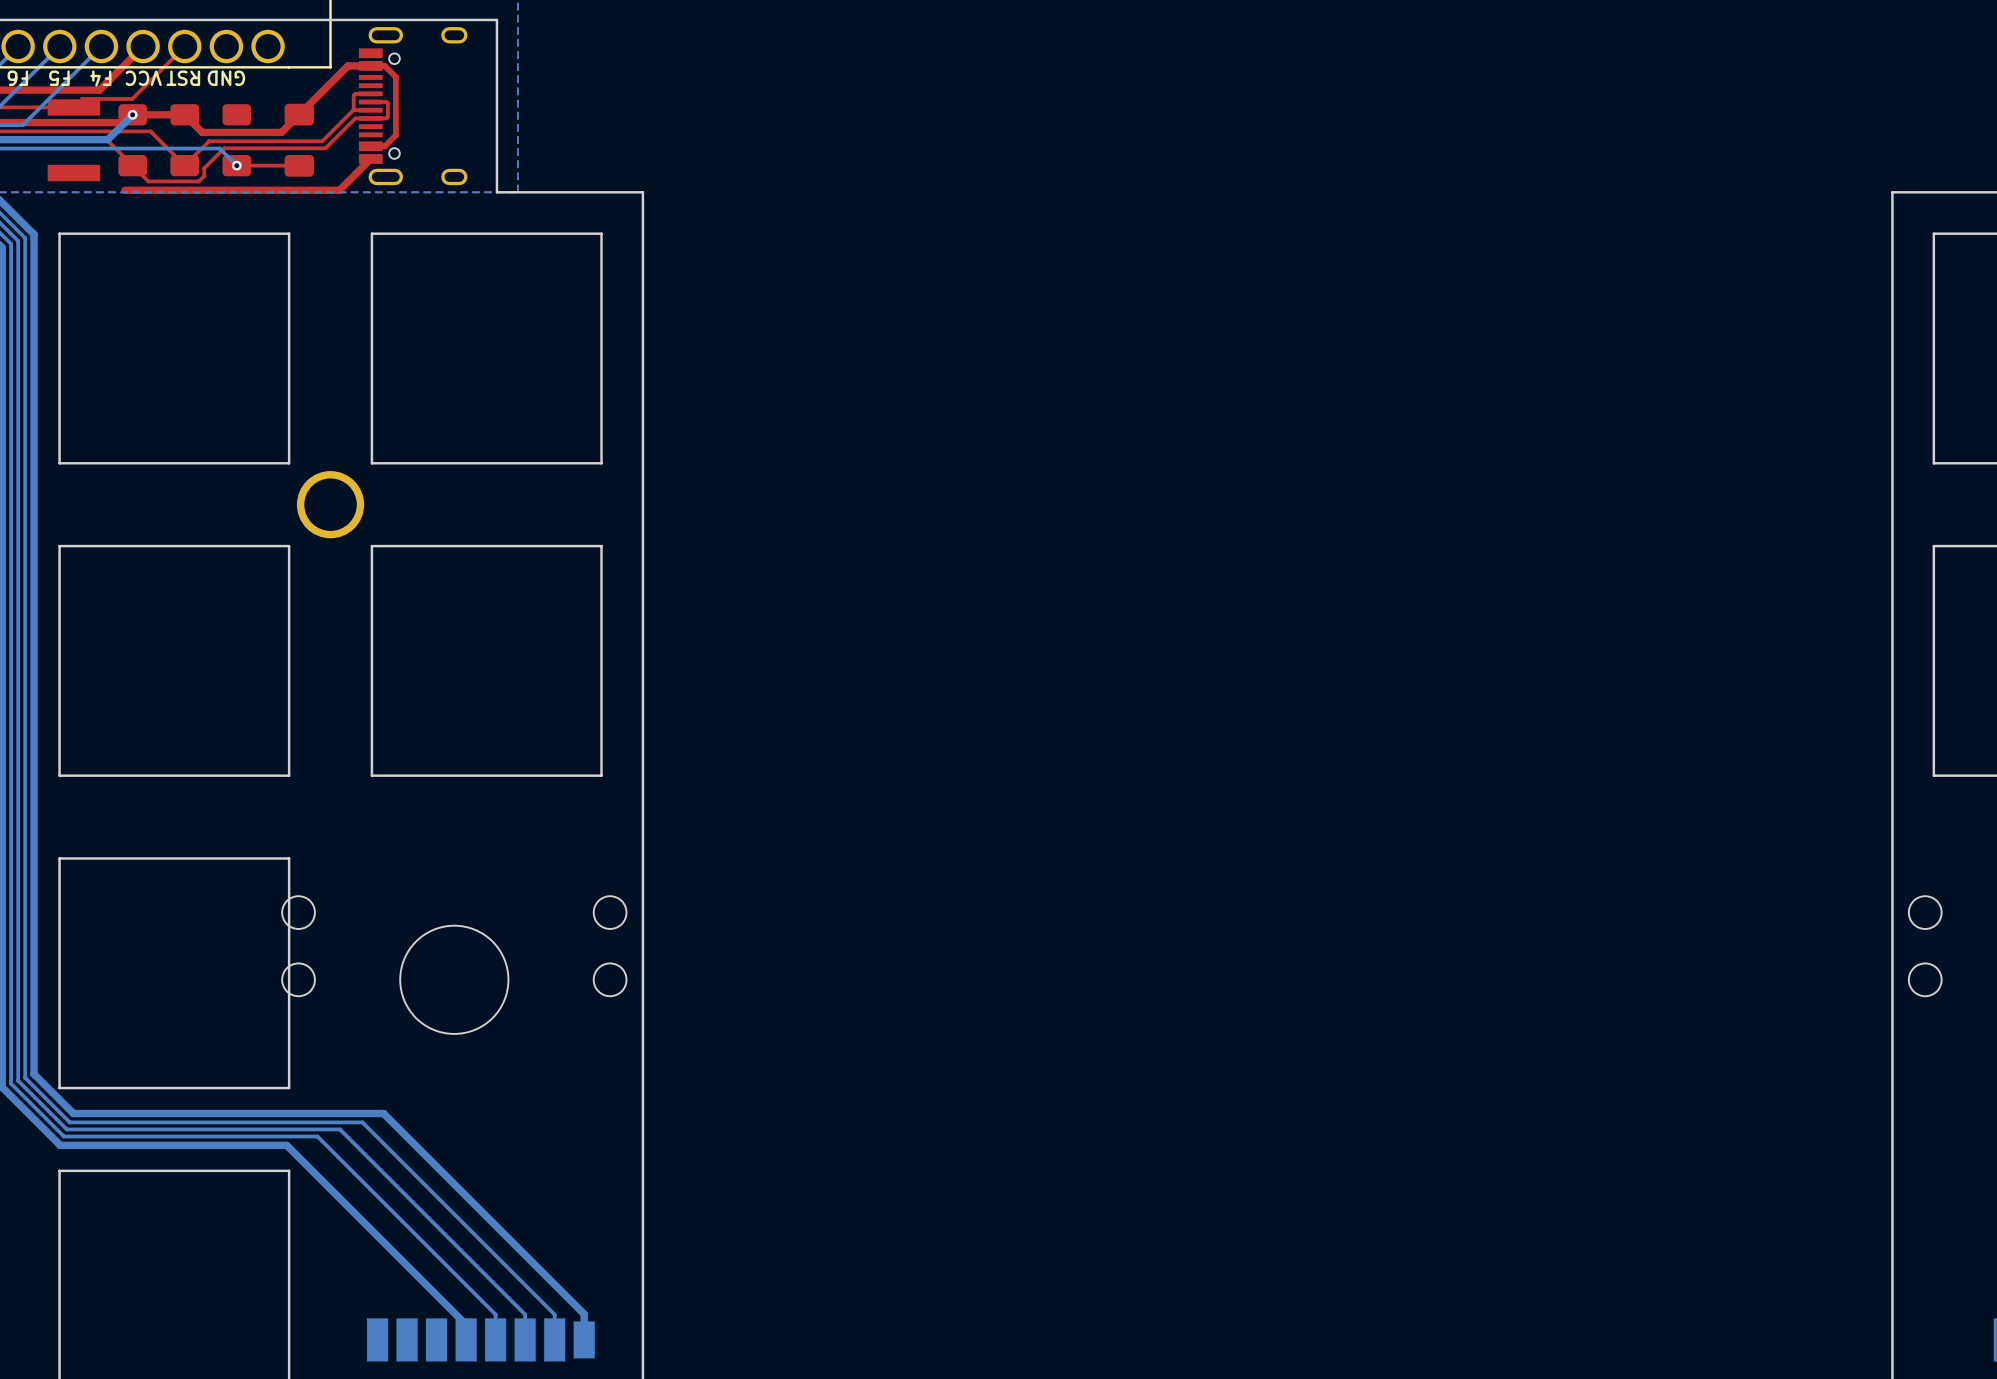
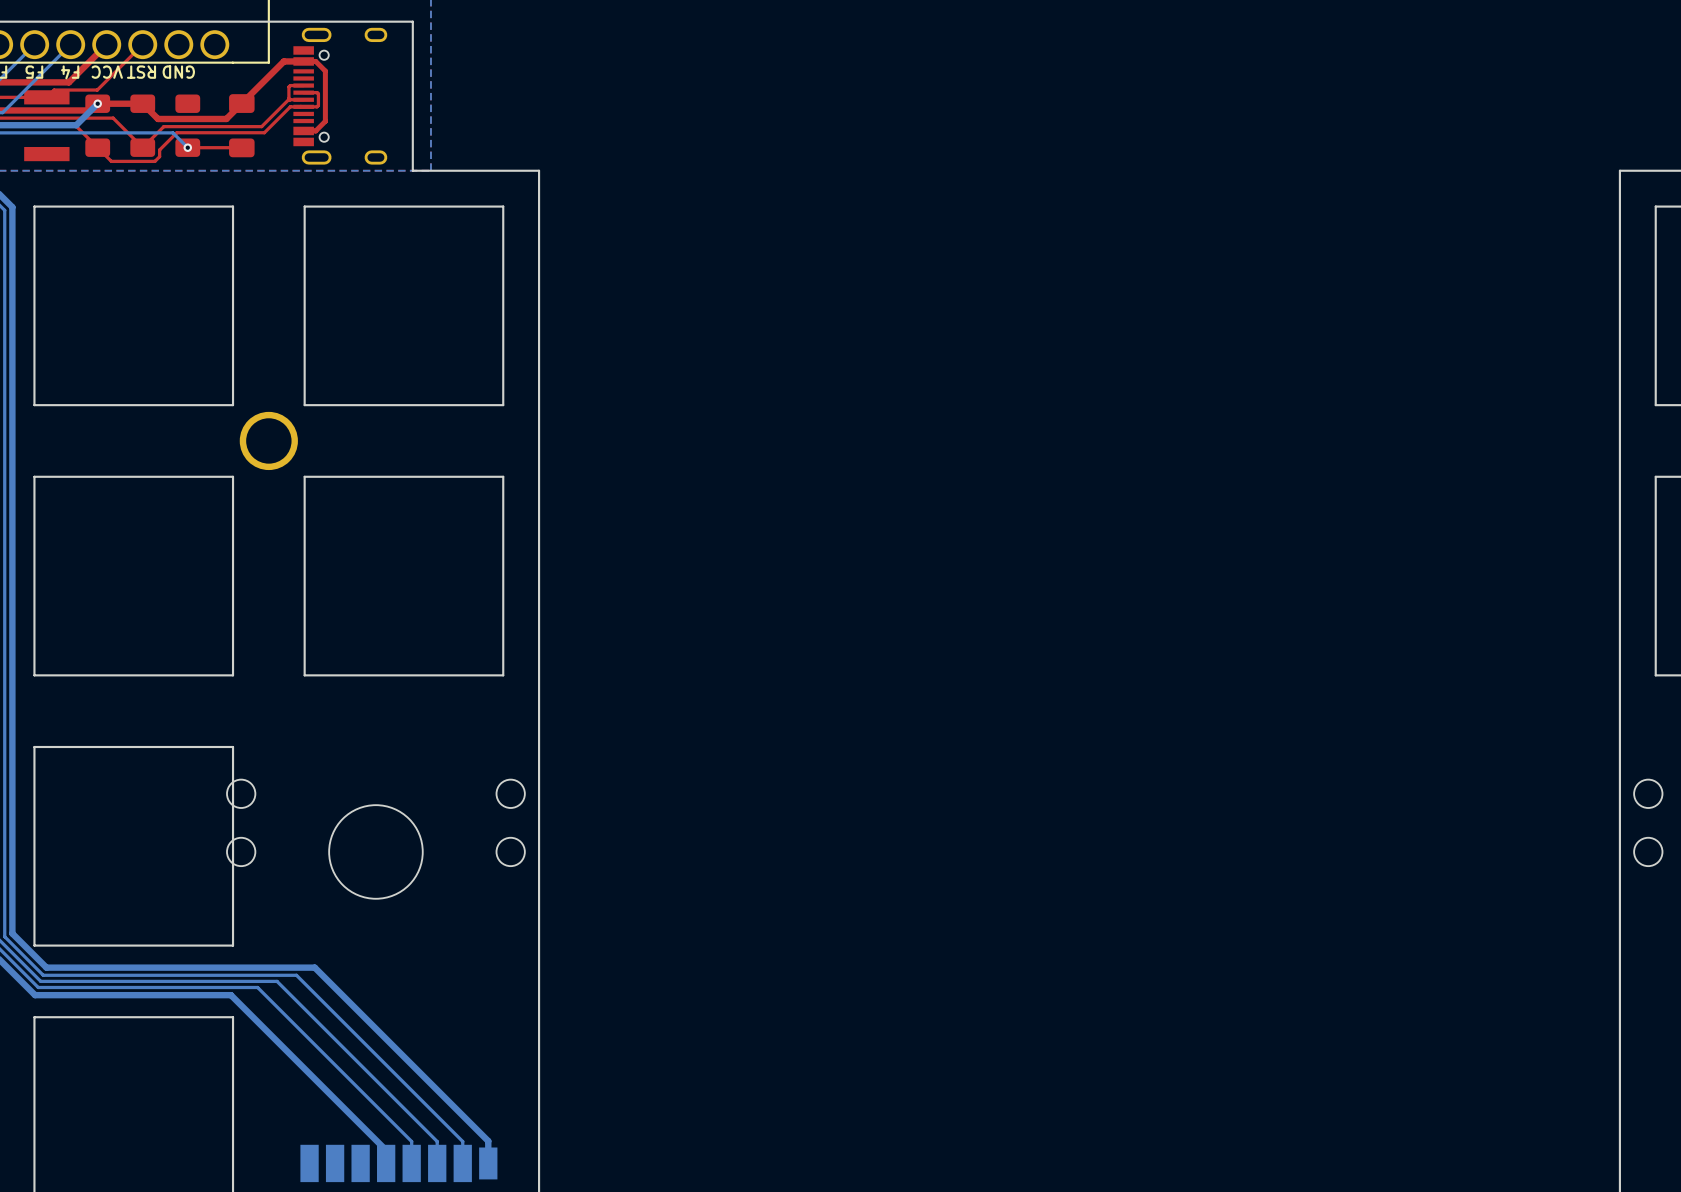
top track: (370, 159) (339, 190) (124, 190) -> none

